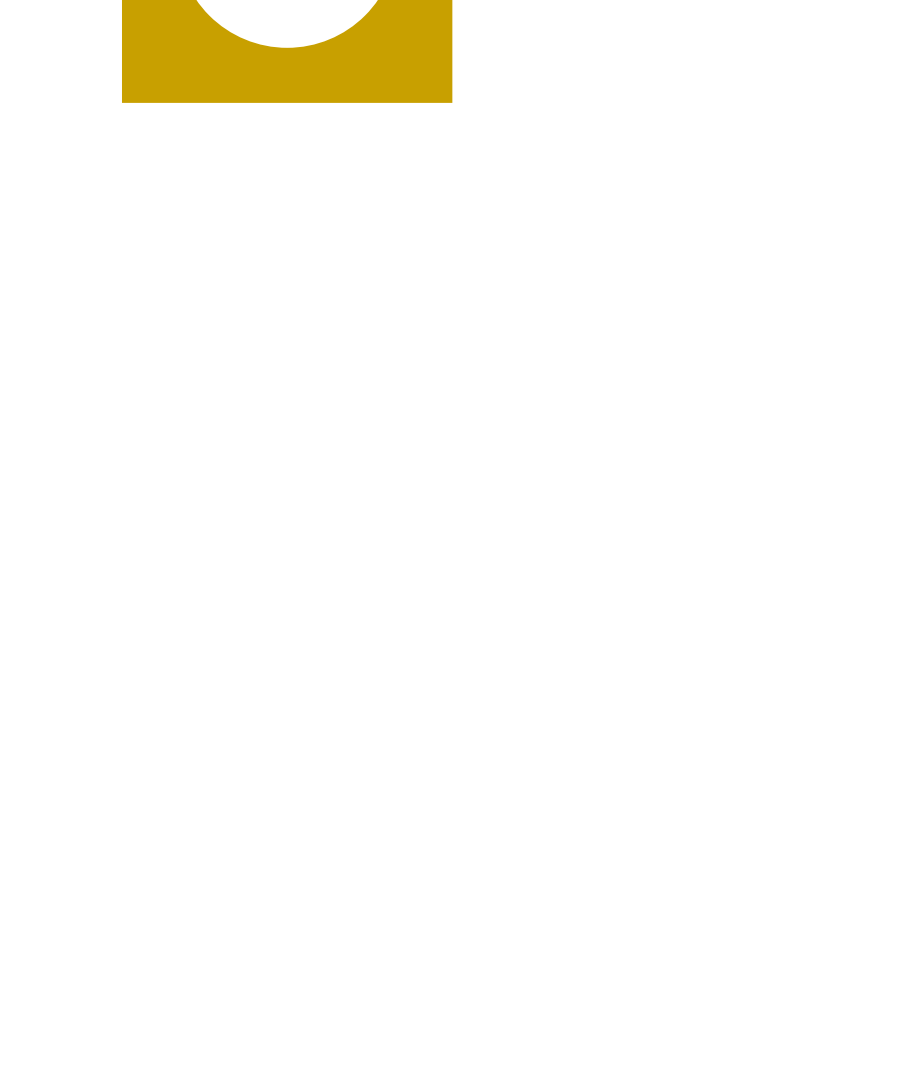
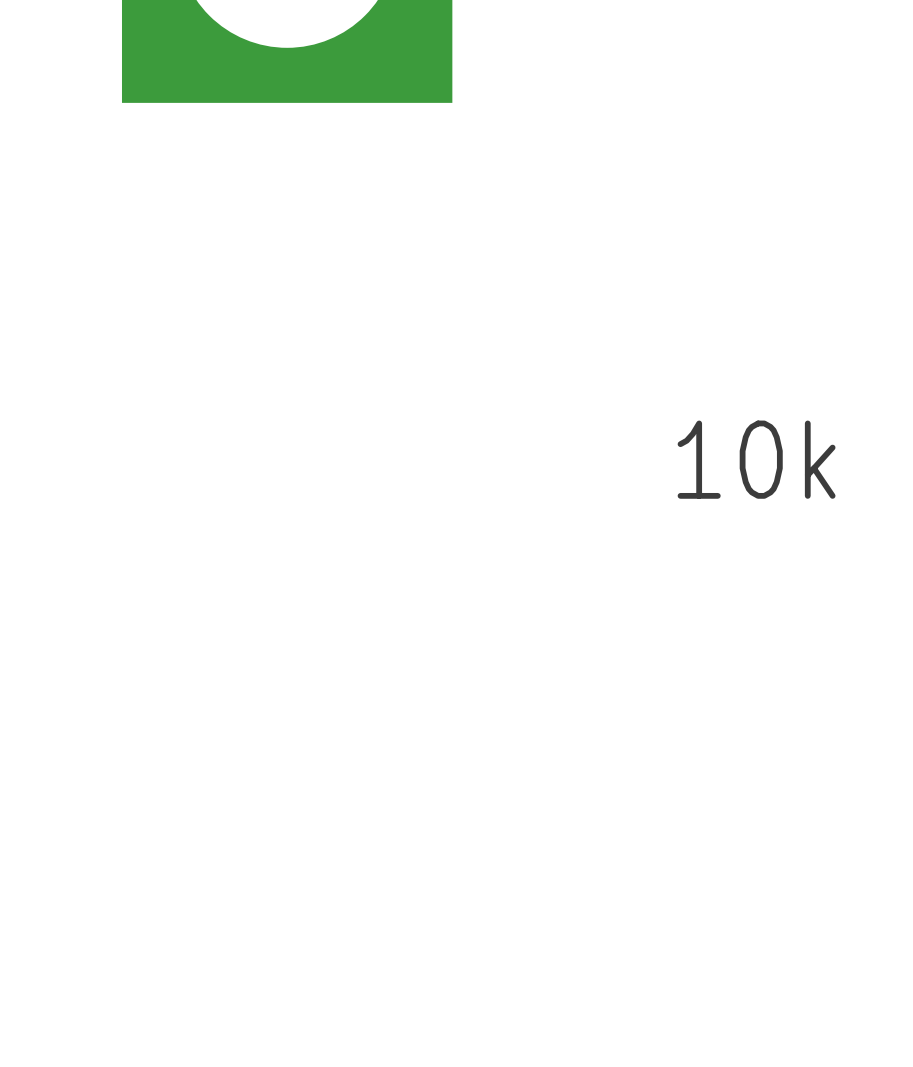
text: none -> 10k (756, 459)

